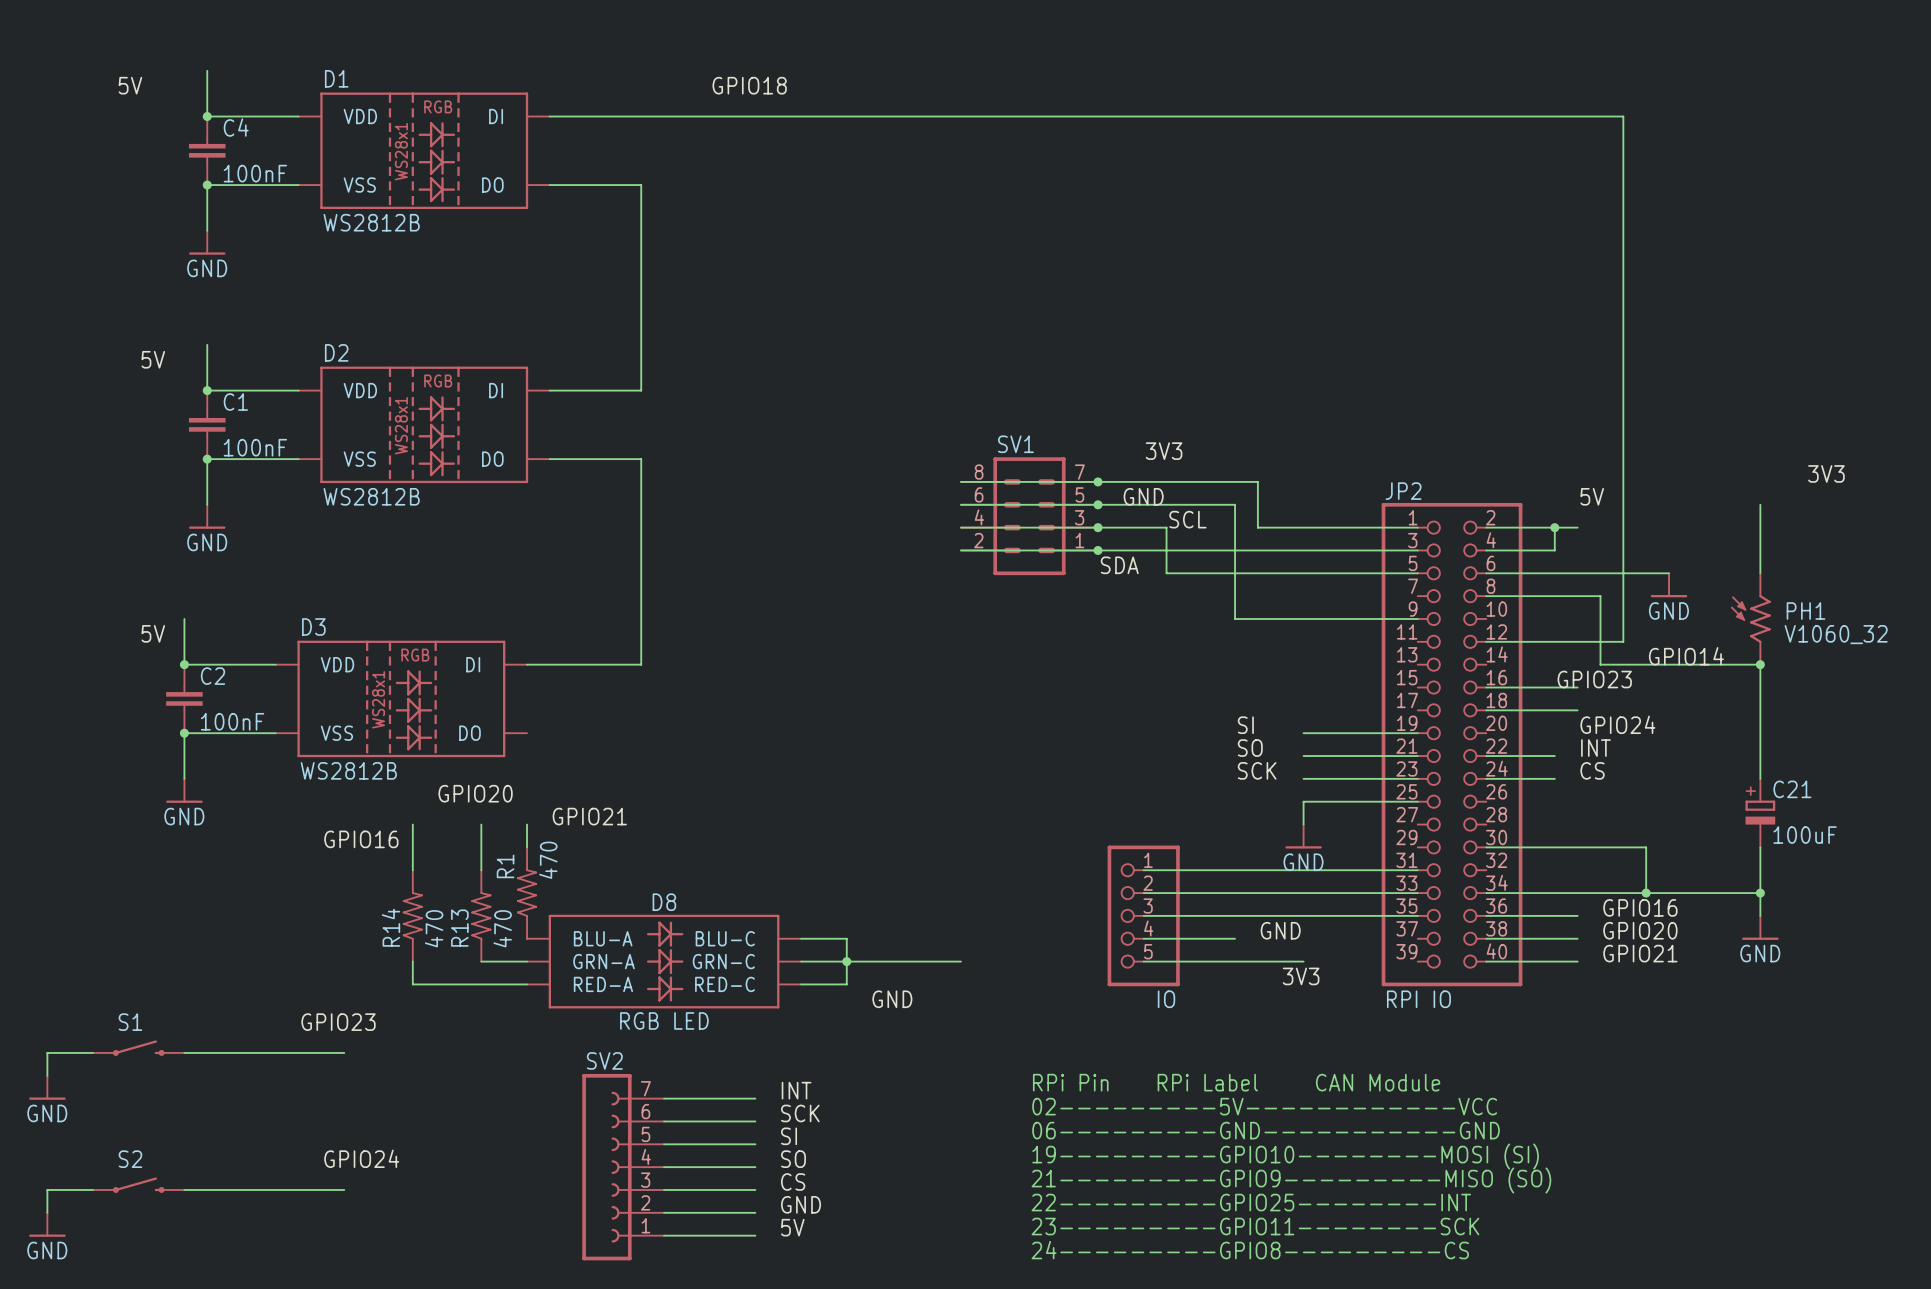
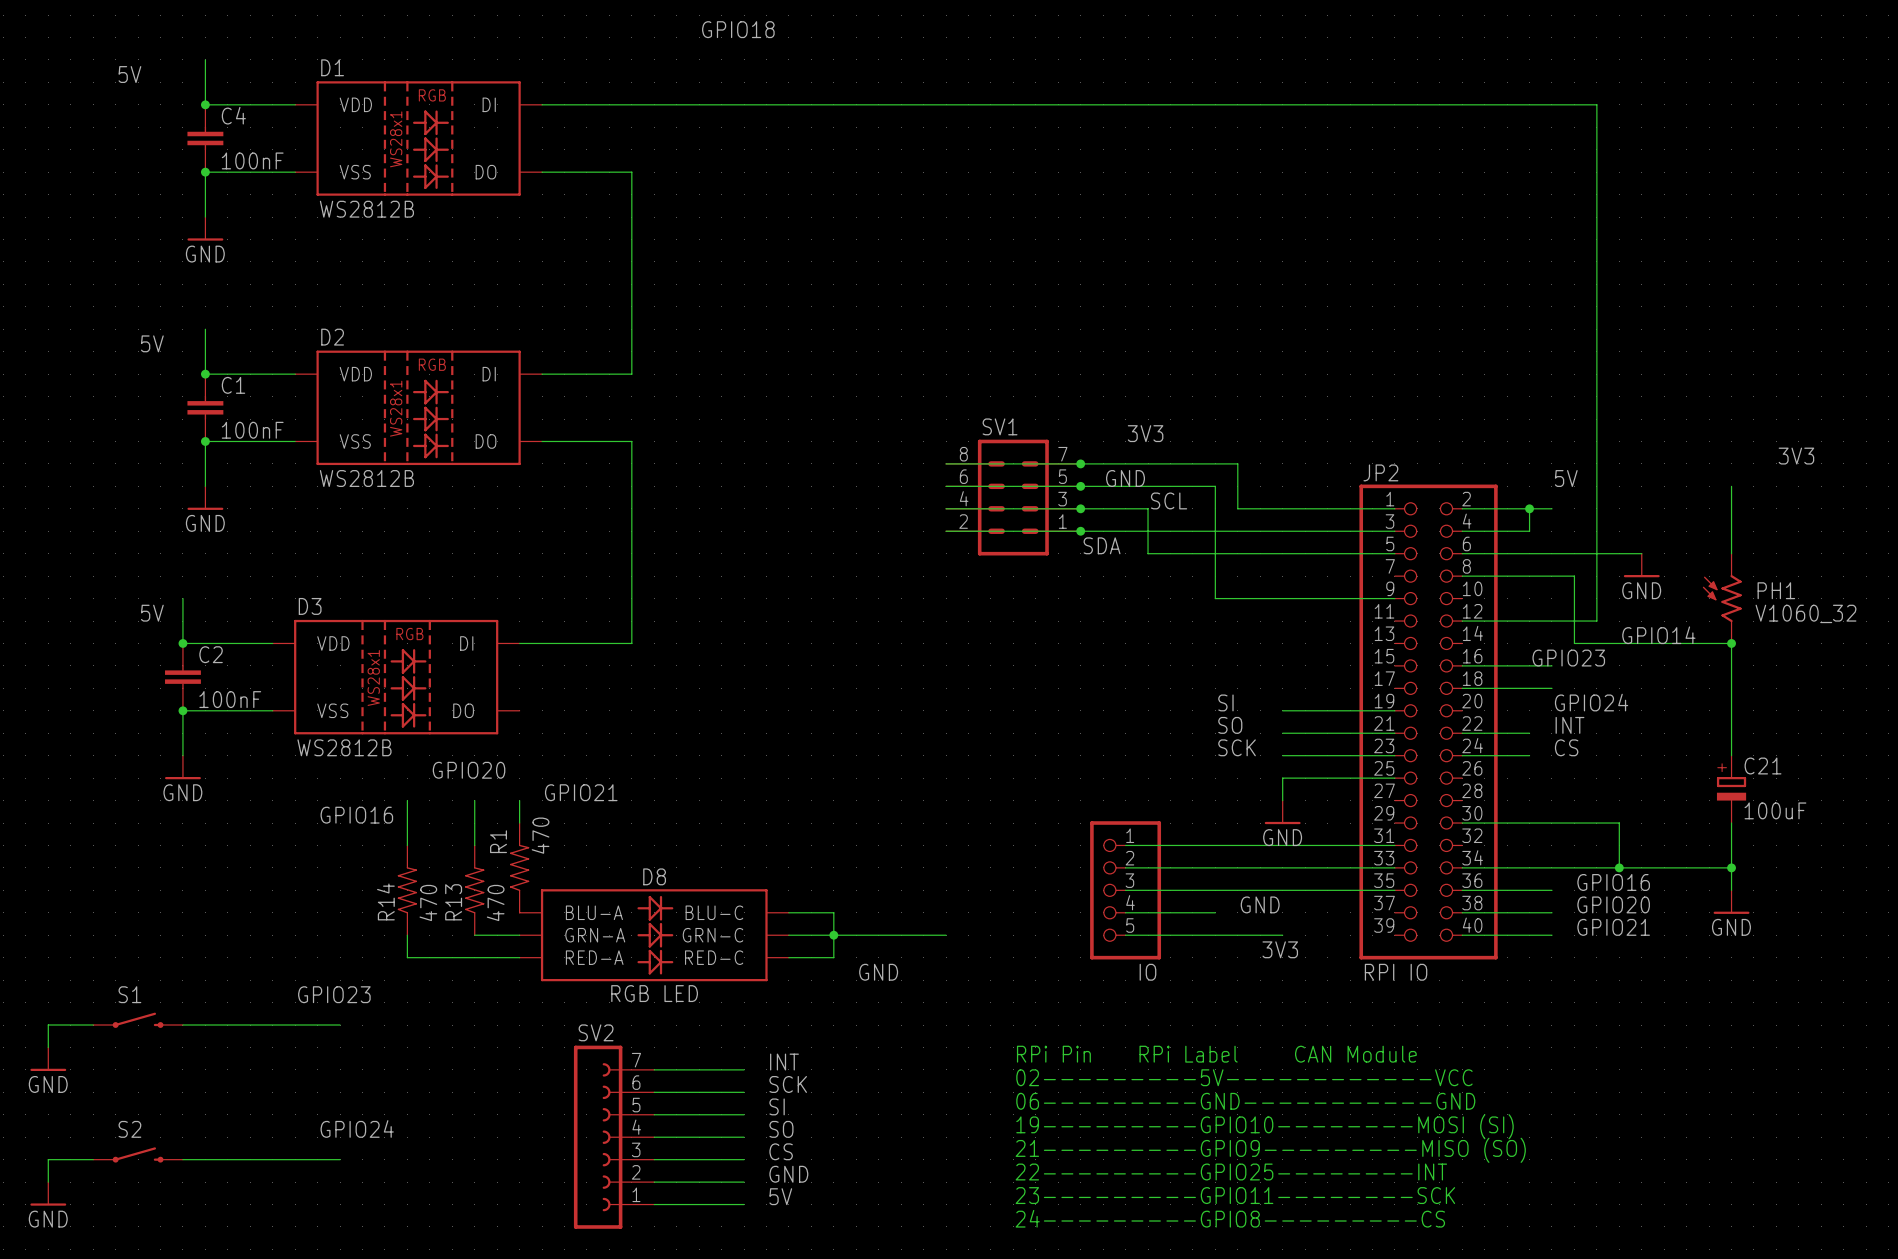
label position: GPIO18 (749, 85) -> GPIO18 (738, 29)

